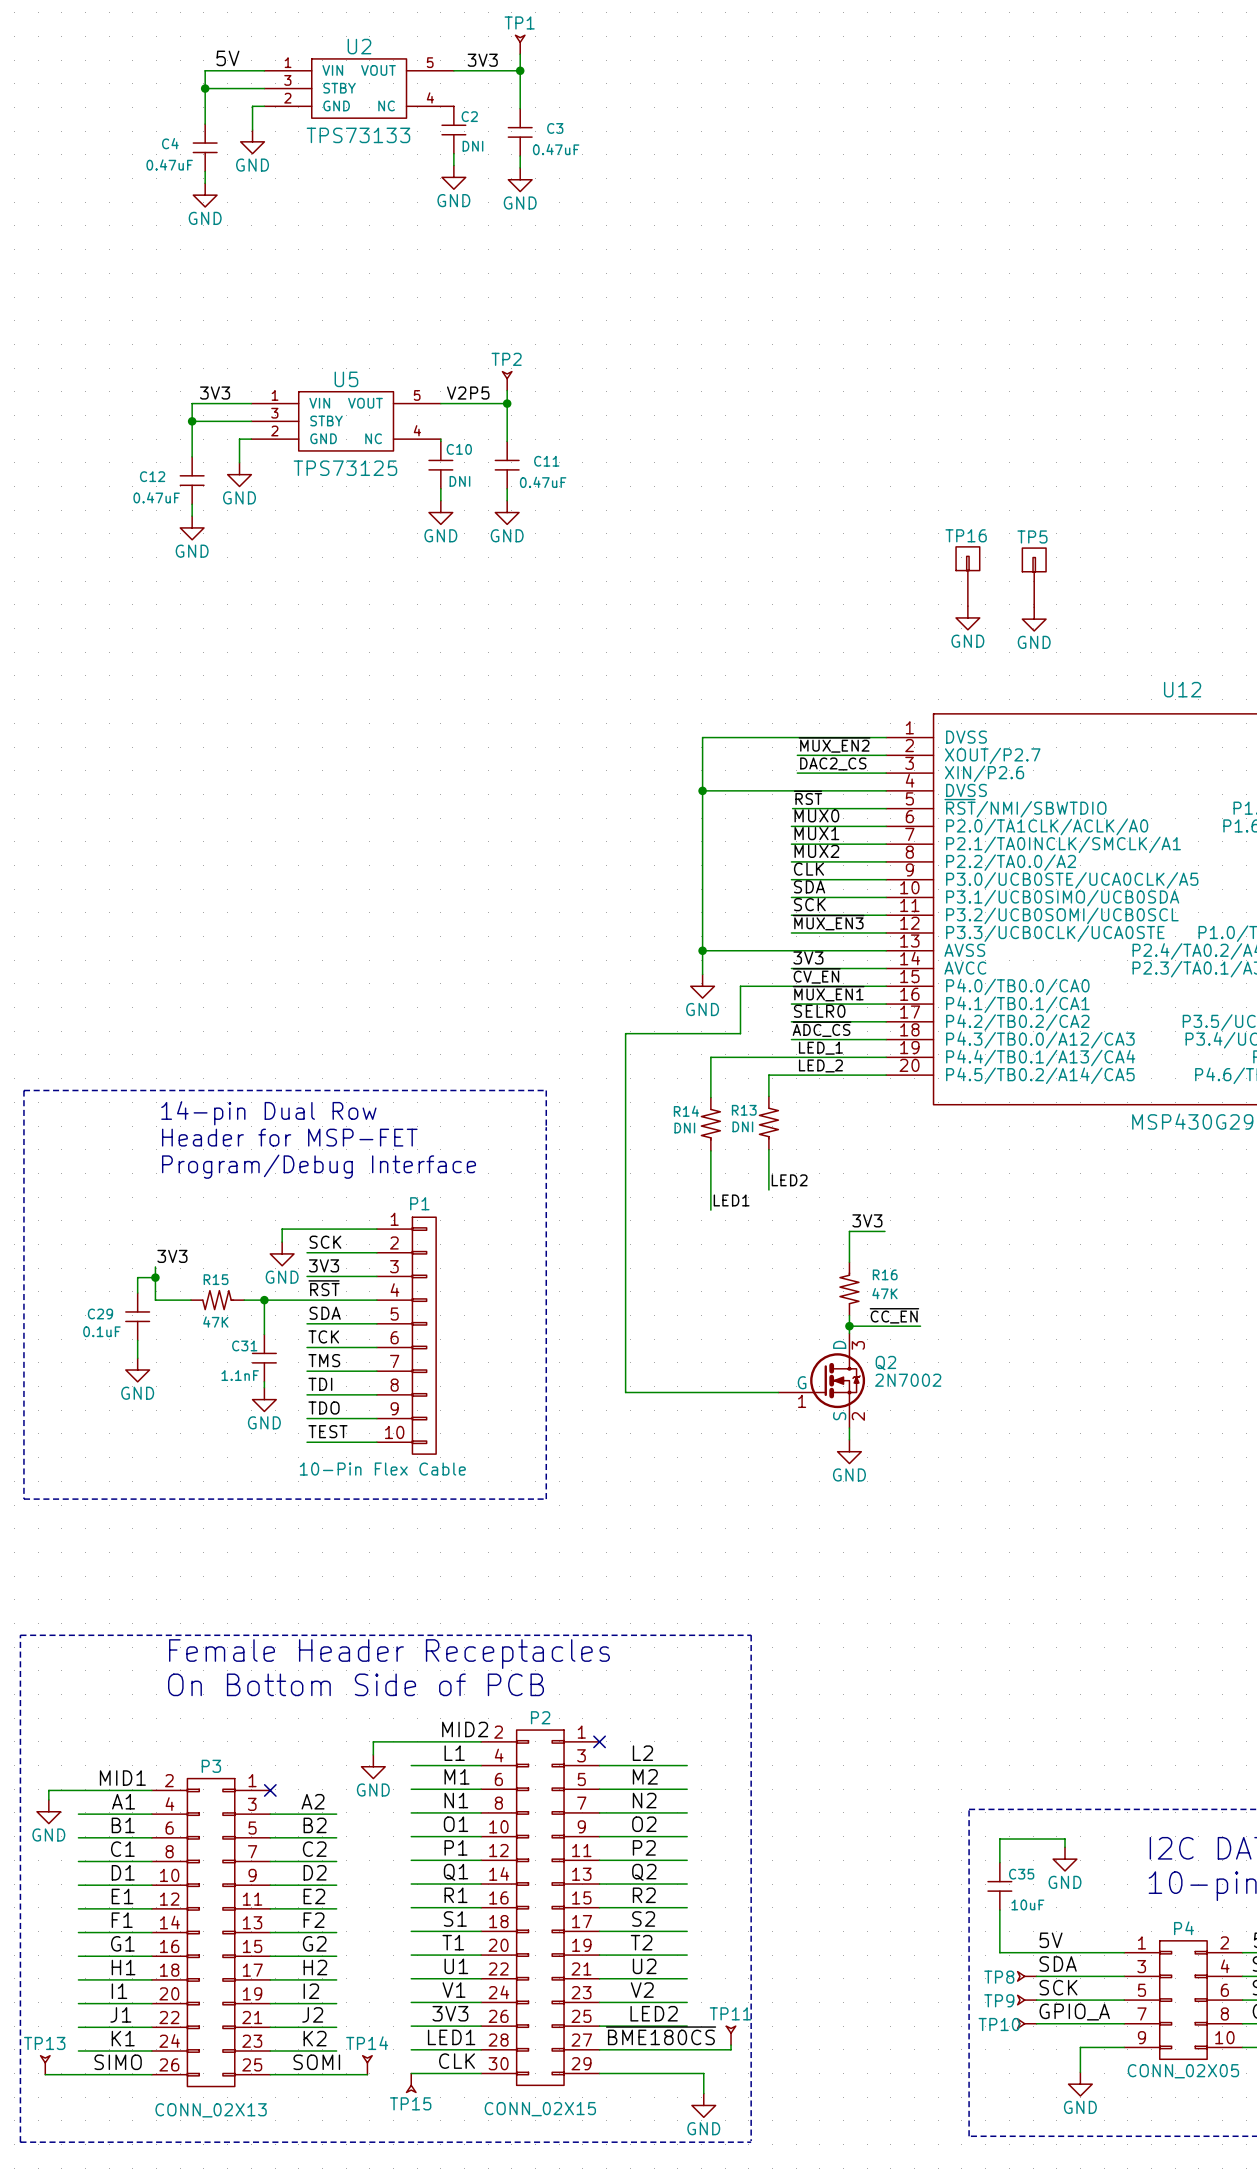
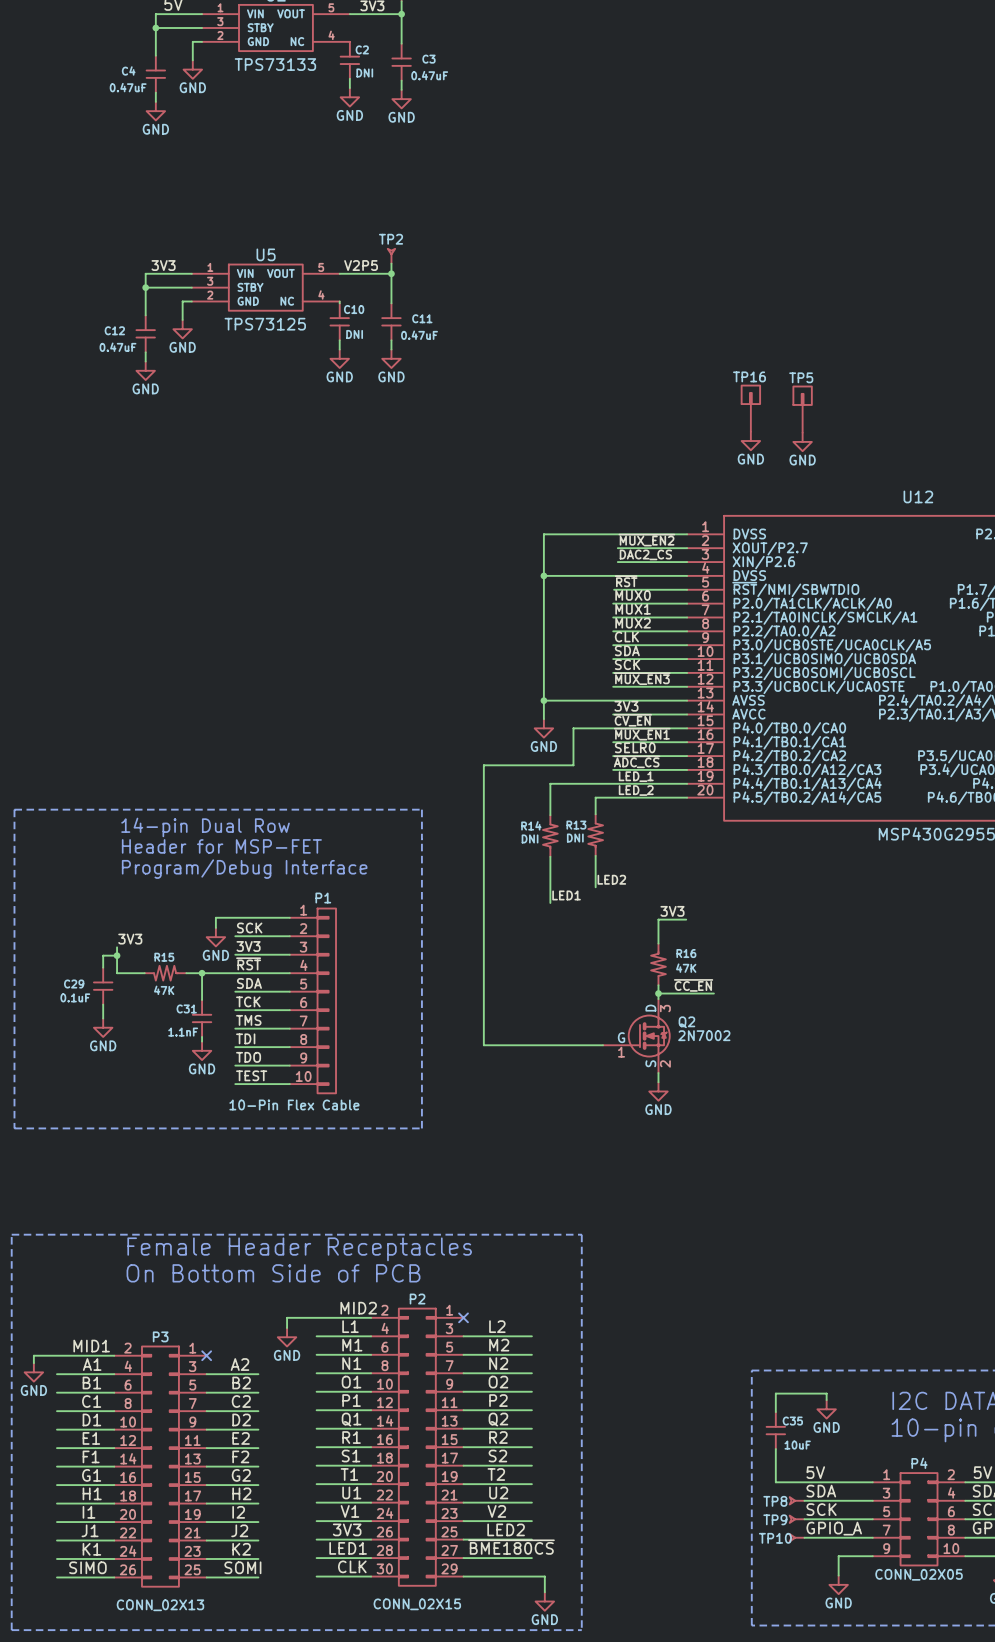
TP11: (731, 2035) -> none
wire: (731, 2045) (731, 2049) (687, 2049) -> none
TP13: (45, 2065) -> none
TP14: (367, 2065) -> none
wire: (45, 2074) (78, 2074) -> none
wire: (336, 2074) (367, 2074) -> none
TP15: (411, 2082) -> none

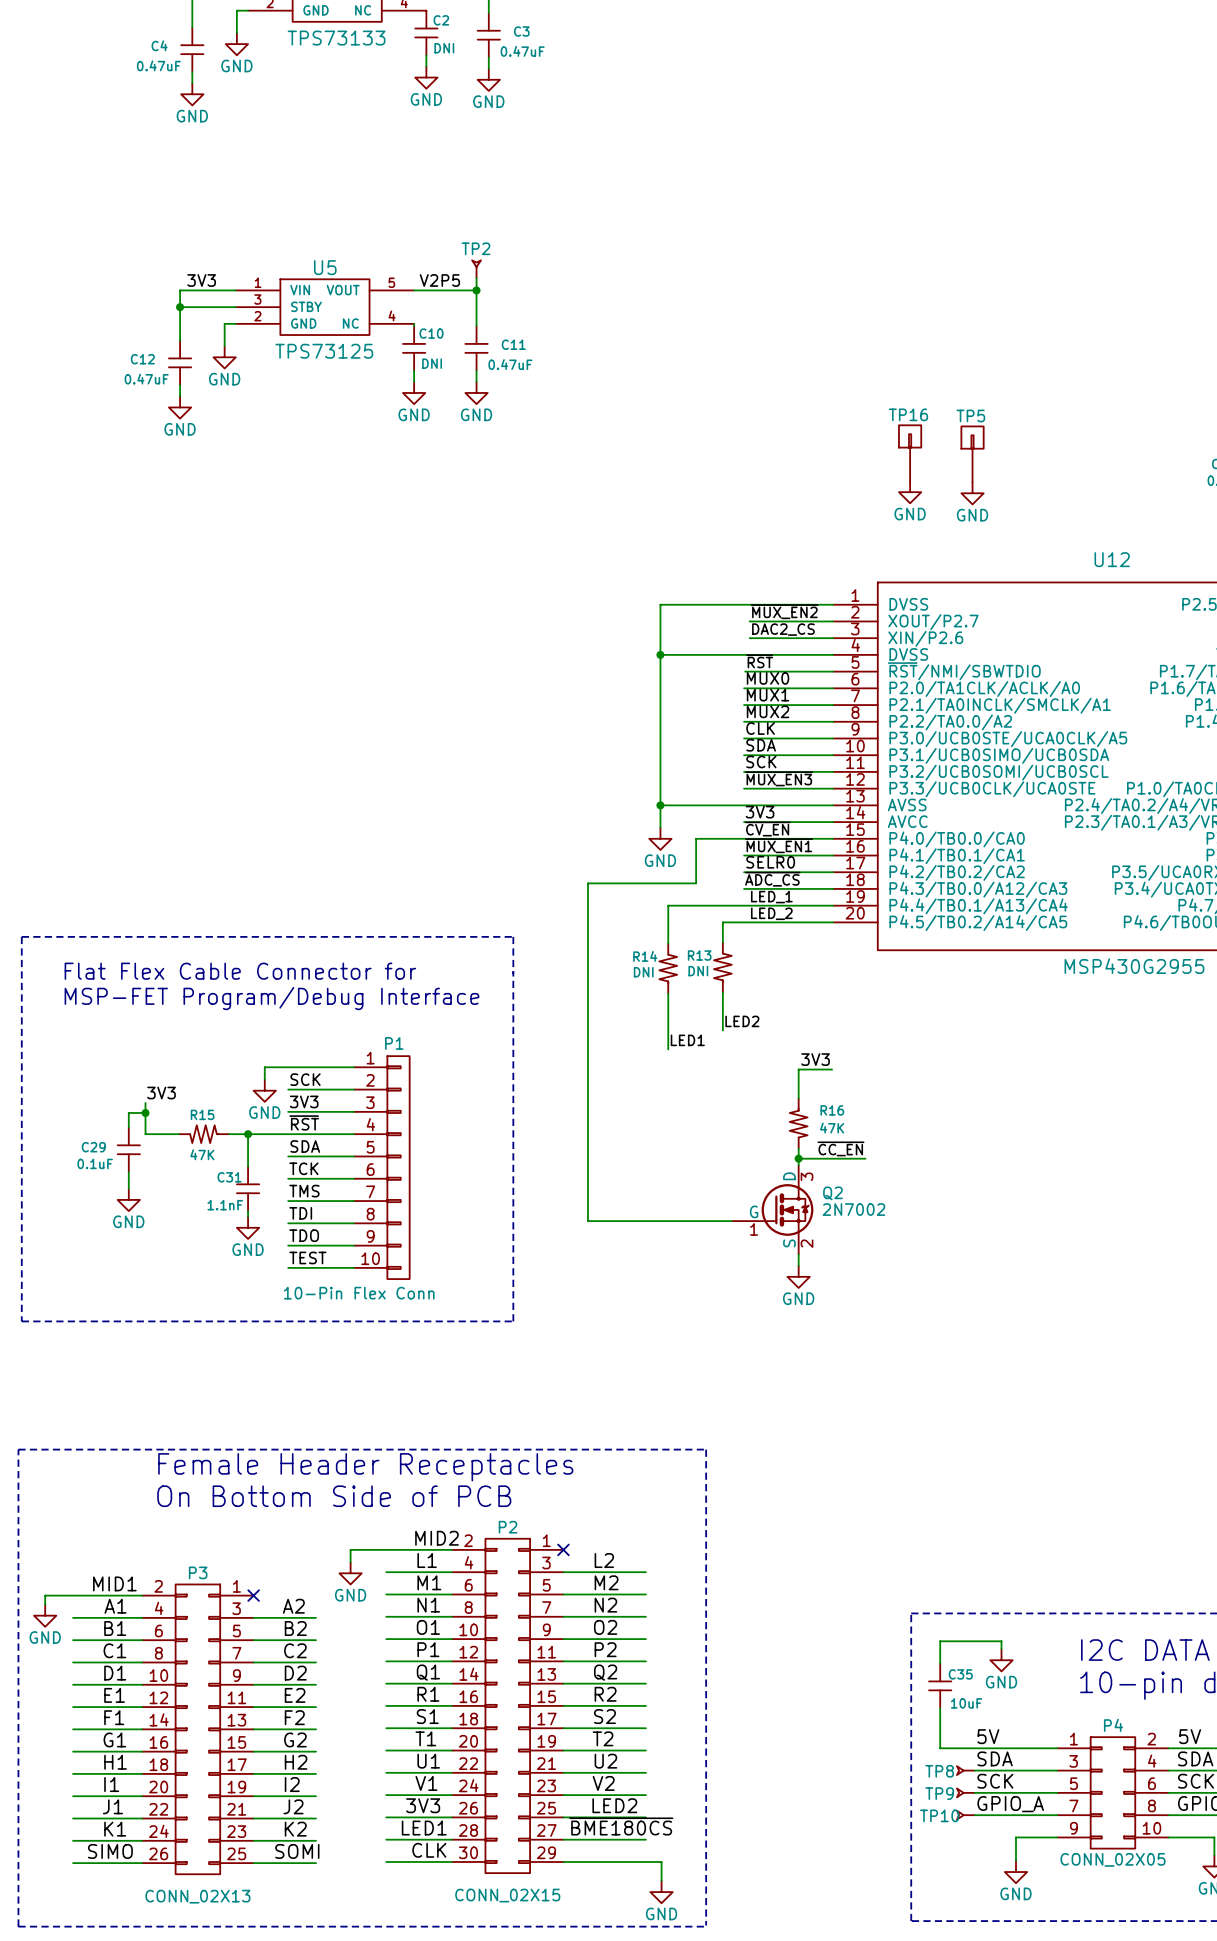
text: 14-pin Dual Row (205, 827) -> none
text: none -> Flat Flex Cable Connector for (240, 971)
text: Header for MSP-FET (221, 846) -> none
text: Program/Debug Interface (244, 869) -> MSP-FET Program/Debug Interface (271, 998)
P1 value: 10-Pin Flex Cable (294, 1104) -> 10-Pin Flex Conn (359, 1293)

